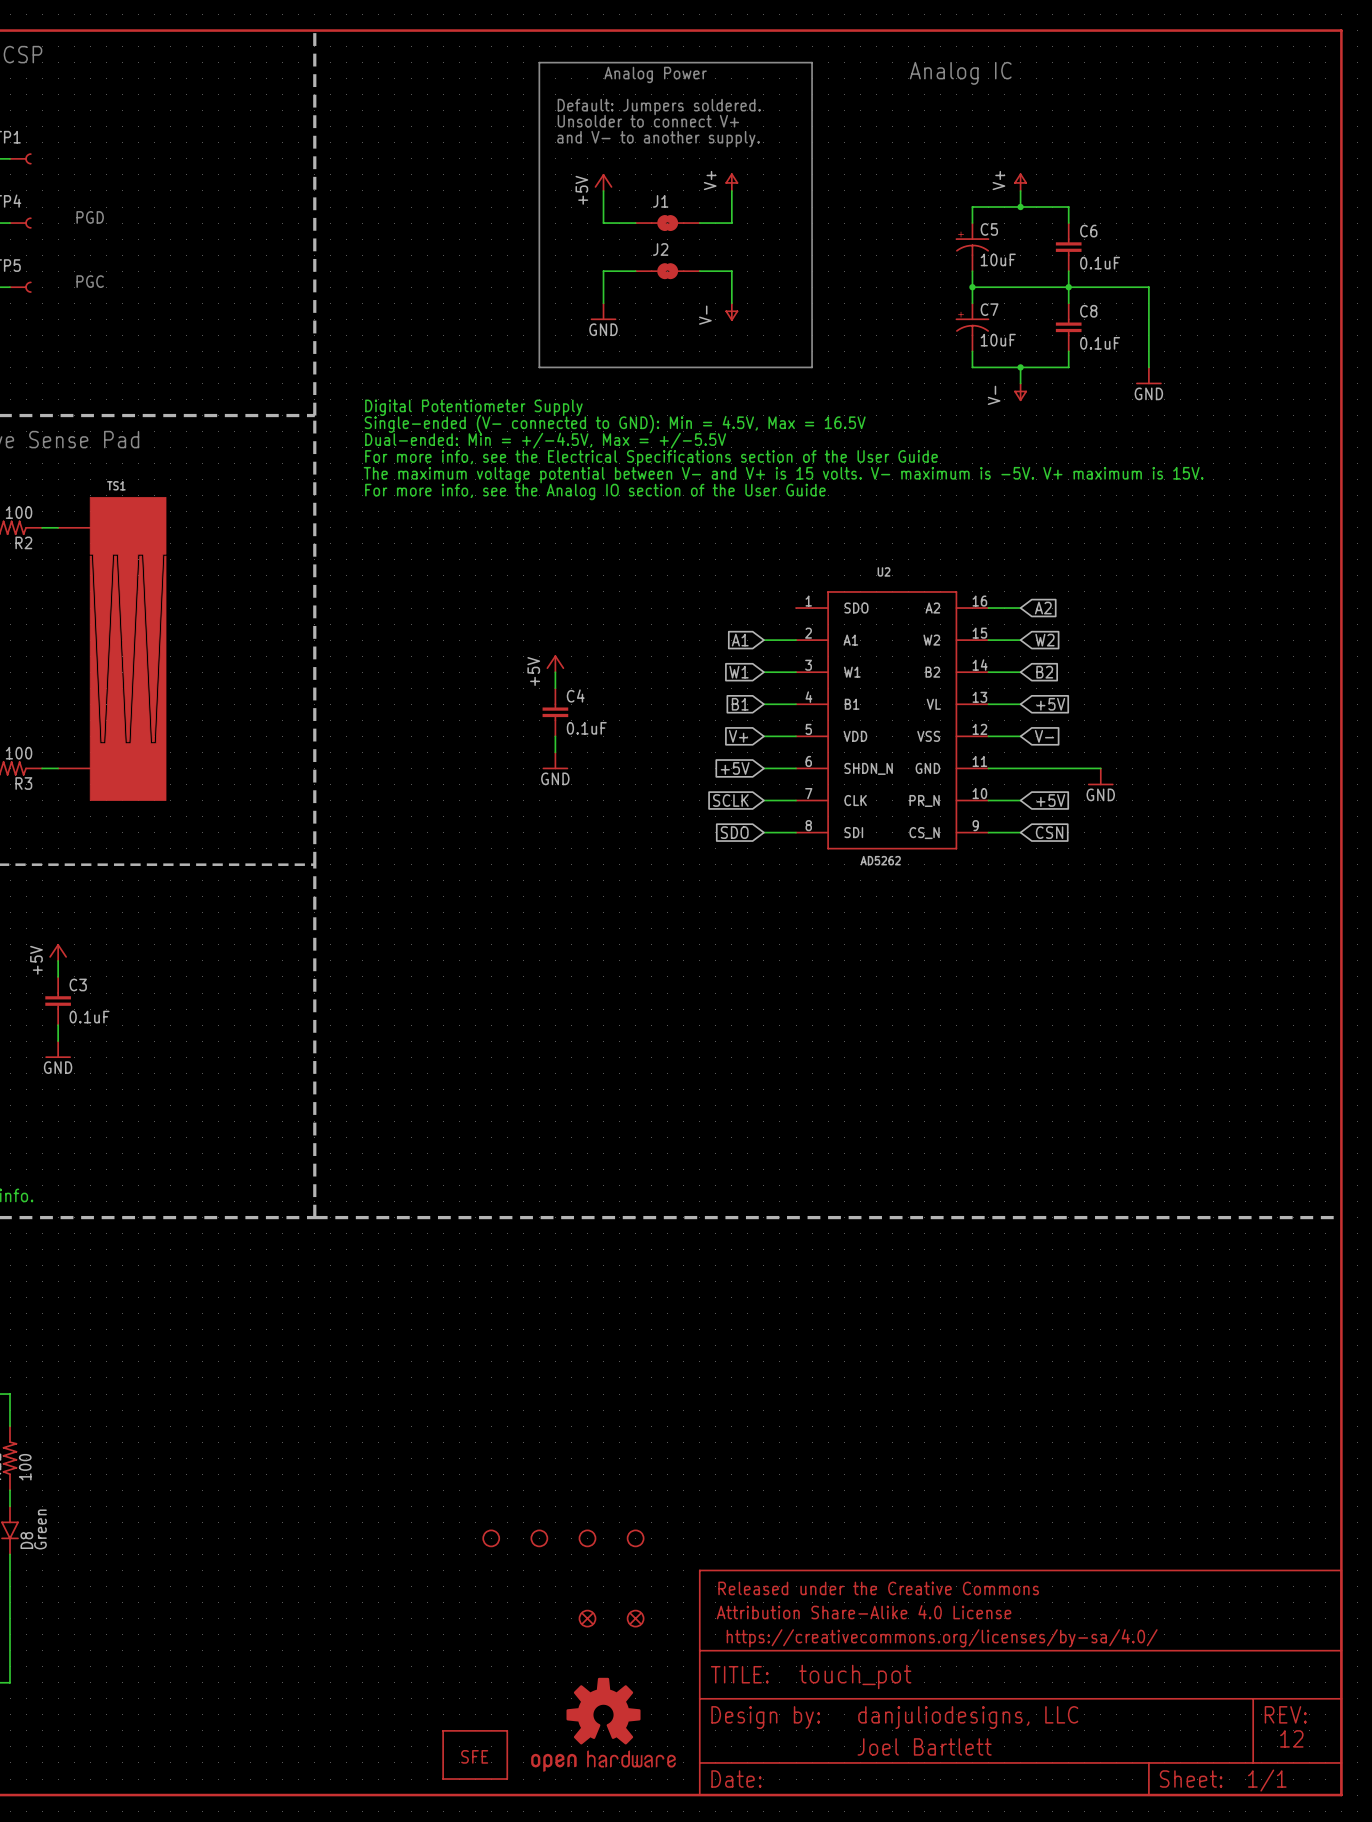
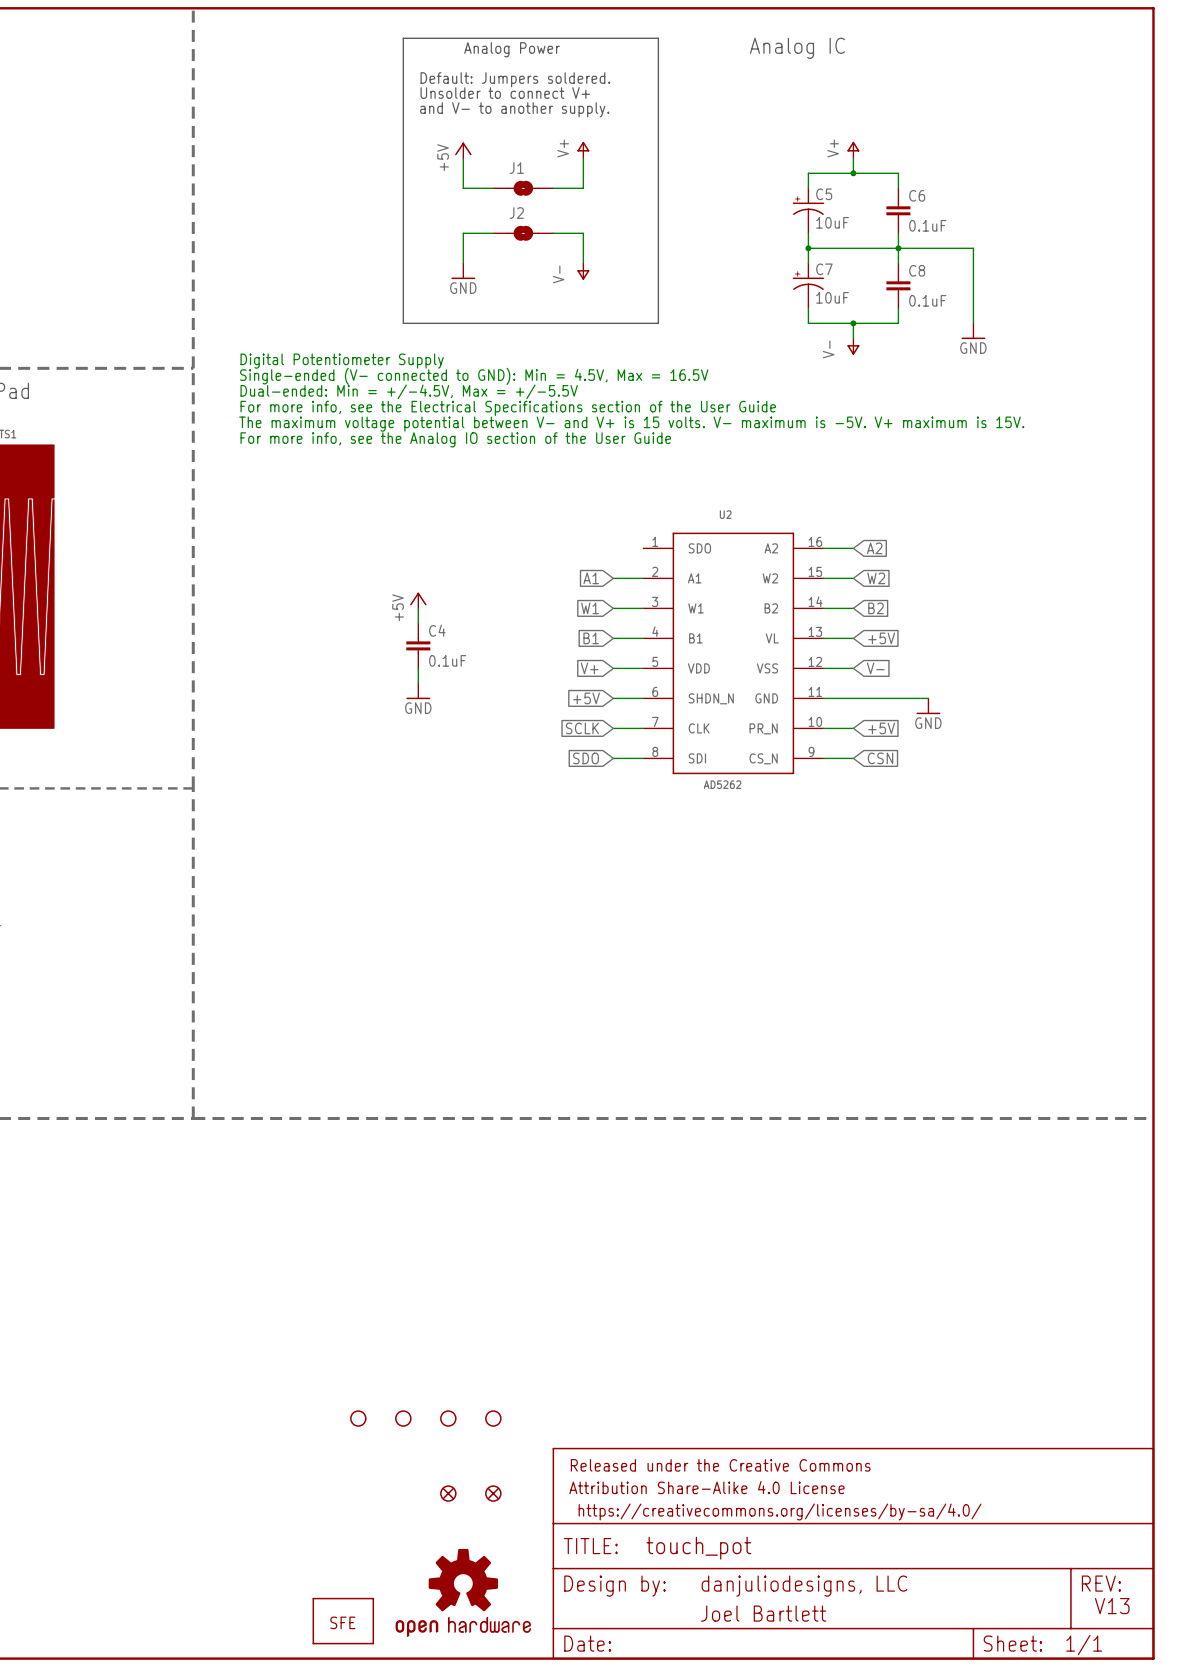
text: 12 (1291, 1738) -> V13 (1112, 1606)

